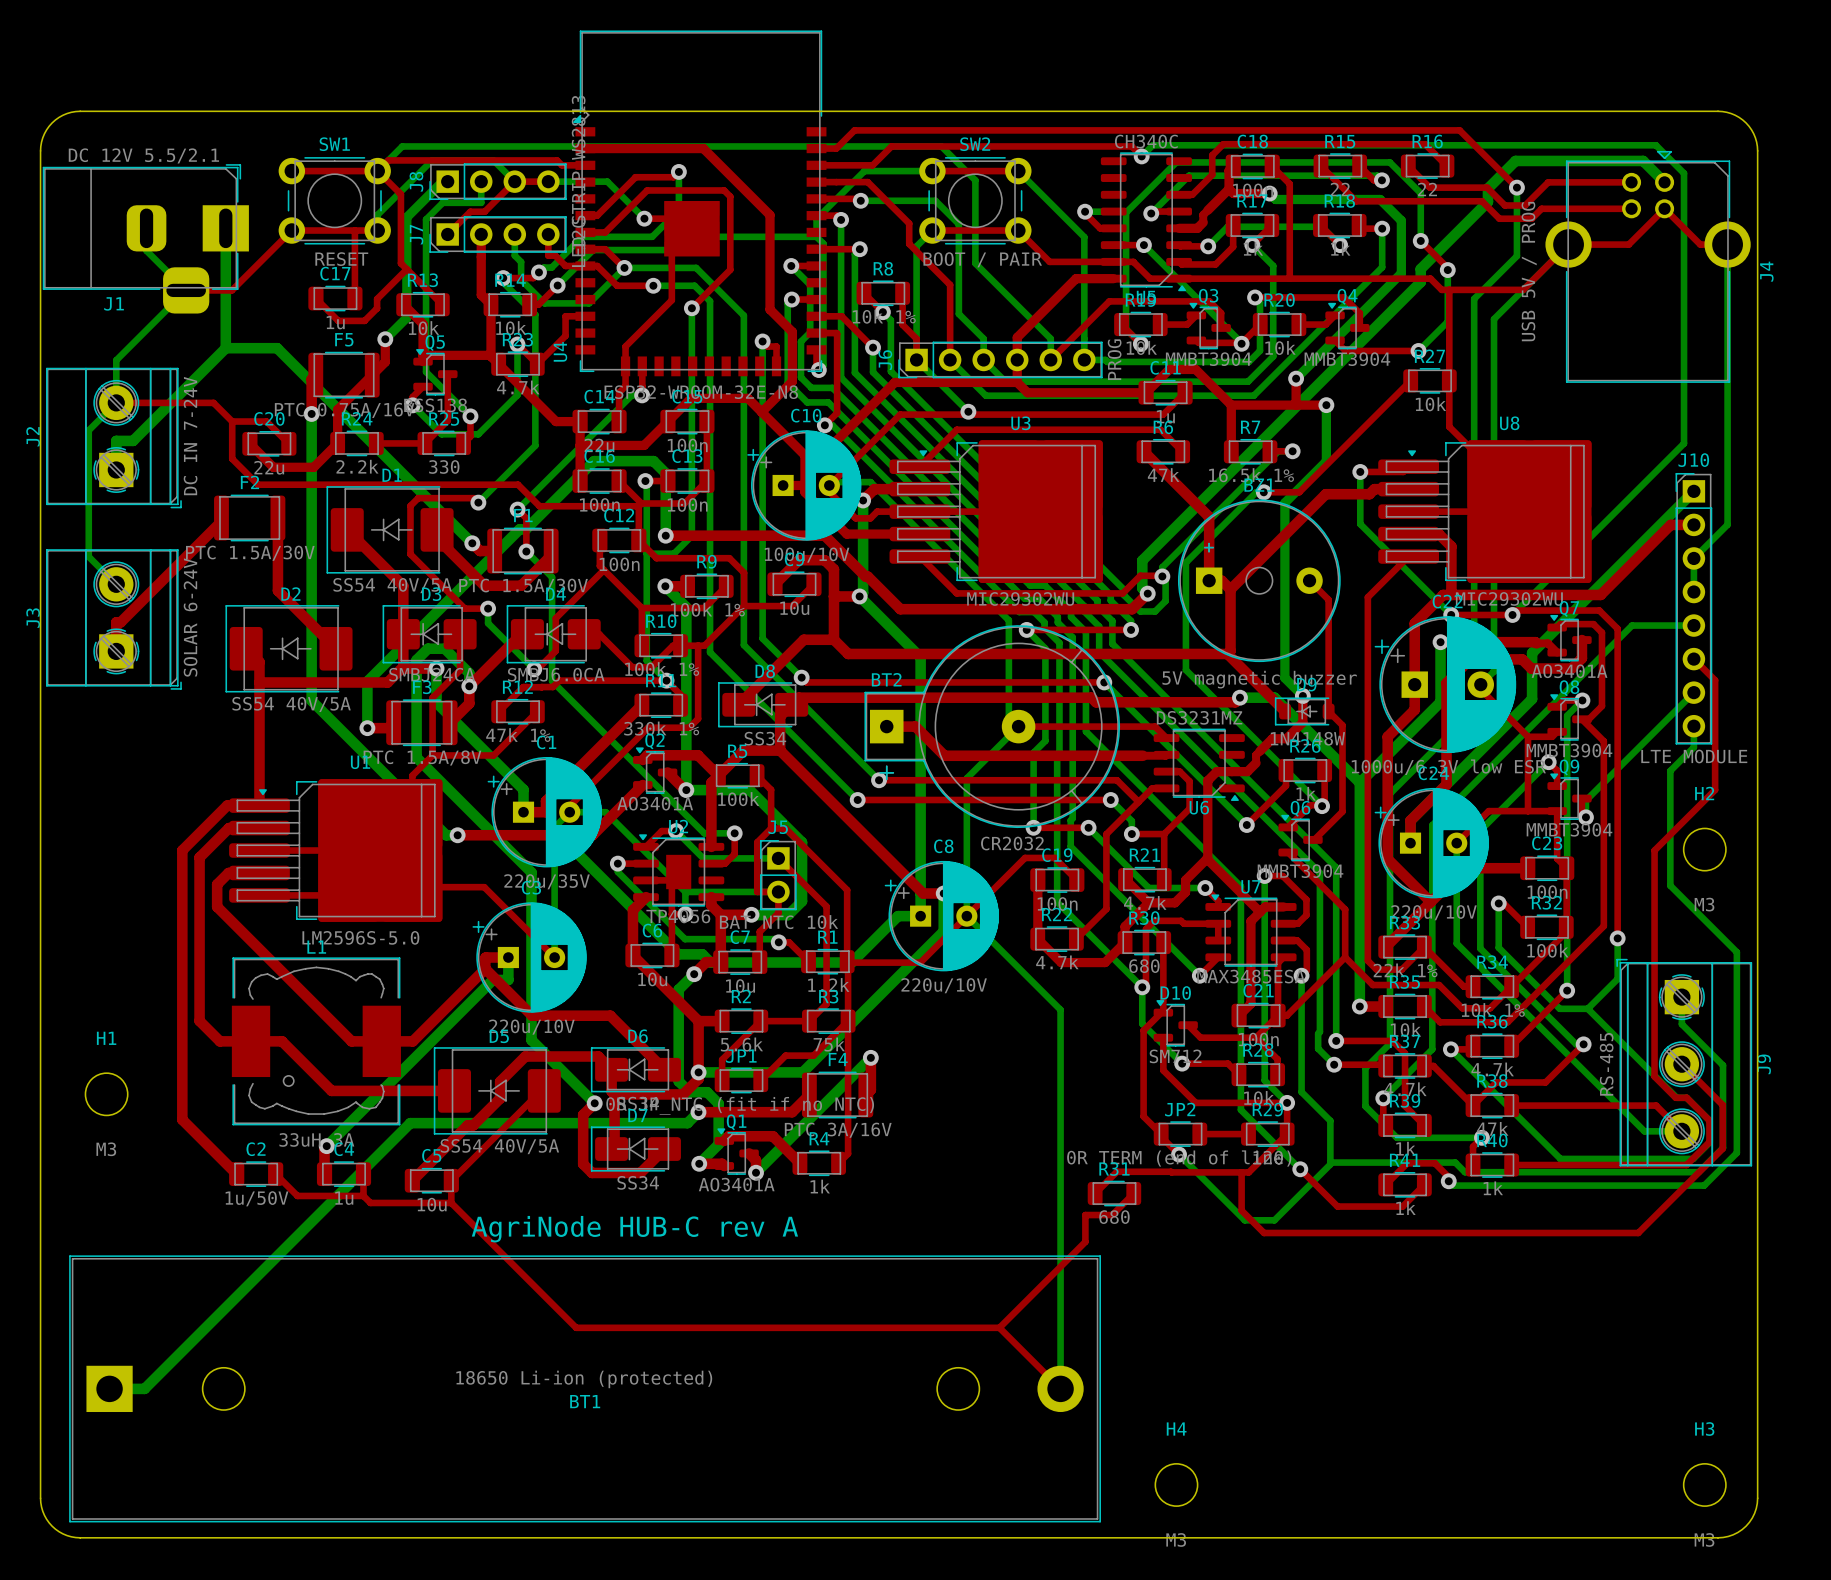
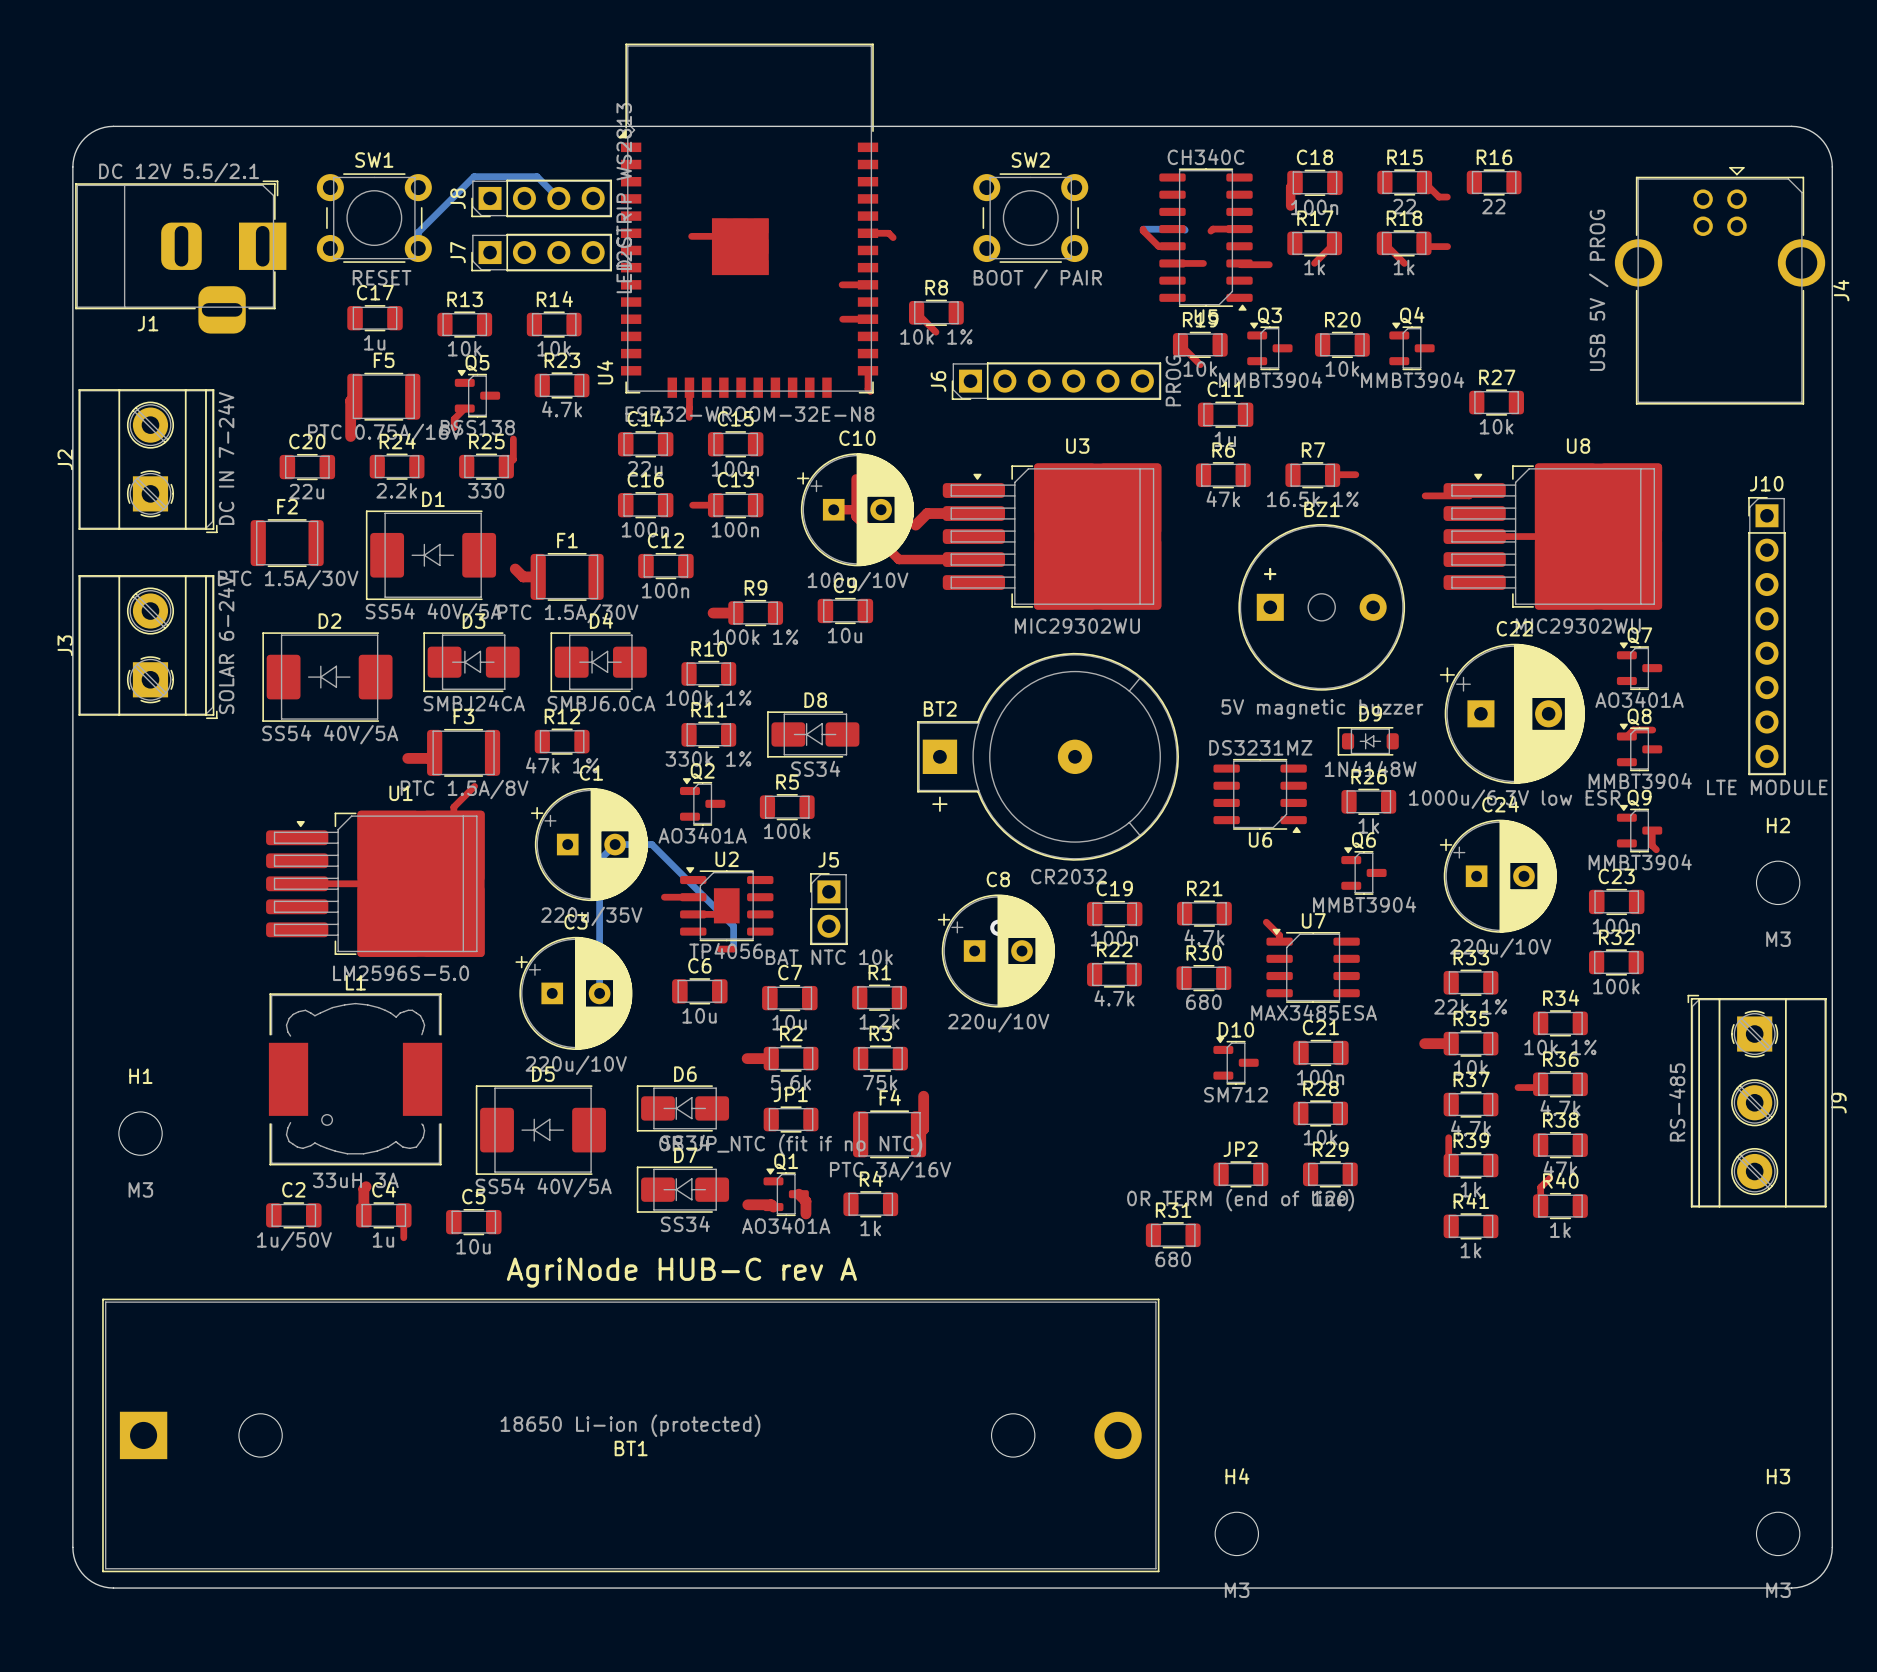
top track: (585, 148) (703, 148) (770, 215) (770, 309) (792, 331) (792, 381) (761, 412) -> none
top track: (816, 148) (836, 148) (854, 130) (1459, 130) (1516, 187) -> none
top track: (1141, 156) (1131, 146) (891, 146) (872, 165) (816, 165) -> none
bottom track: (1141, 156) (1152, 145) (1655, 145) (1684, 173) (1684, 443) (1512, 614) -> none
via: (1141, 156) -> none
top track: (585, 165) (561, 165) (557, 160) (388, 160) (377, 171) -> none
top track: (1272, 166) (1289, 183) (1289, 278) -> none
top track: (1321, 166) (1356, 201) (1482, 201) (1499, 218) (1531, 218) (1541, 208) (1631, 208) -> none
top track: (1408, 166) (1429, 187) (1487, 187) (1504, 205) (1525, 205) (1548, 182) (1631, 182) -> none
top track: (1446, 166) (1425, 144) (1223, 144) (1212, 155) (1212, 174) (1192, 194) (1179, 194) -> none
top track: (291, 171) (377, 171) -> none
top track: (377, 171) (400, 194) (400, 263) (406, 269) -> none
bottom track: (377, 171) (402, 146) (941, 146) (975, 180) (975, 263) (1050, 338) (1050, 359) -> none
top track: (678, 171) (673, 177) (635, 177) (597, 215) (585, 215) -> none
bottom track: (678, 171) (678, 210) (652, 236) (582, 236) (551, 267) (543, 267) (538, 272) -> none
via: (678, 171) -> none
top track: (932, 171) (1018, 171) -> none
bottom track: (932, 171) (864, 171) (816, 218) (816, 236) -> none
bottom track: (1018, 171) (1084, 237) (1084, 359) (1105, 359) (1107, 361) (1248, 361) (1260, 350) (1260, 302) (1255, 297) -> none
bottom track: (1381, 180) (1377, 175) (1189, 175) (1151, 213) -> none
via: (1381, 180) -> none
bottom track: (447, 181) (442, 181) (406, 217) (406, 317) (385, 339) -> none
bottom track: (481, 181) (481, 202) (442, 202) (426, 219) (426, 371) (470, 416) -> none
top track: (548, 181) (514, 181) (484, 211) (470, 211) (447, 234) -> none
bottom track: (548, 181) (607, 181) (644, 218) -> none
top track: (816, 182) (867, 182) (909, 223) (909, 243) (950, 284) (950, 359) -> none
bottom track: (1664, 182) (1643, 160) (1515, 160) (1487, 188) (1487, 201) (1420, 269) (1420, 282) (1142, 560) (1142, 588) (1147, 593) -> none
bottom track: (1516, 187) (1516, 256) (1474, 298) (1474, 633) (1456, 651) (1456, 727) (1390, 793) (1390, 1043) (1365, 1068) (1365, 1106) (1396, 1137) (1481, 1137) -> none
via: (1516, 187) -> none
top track: (1269, 193) (1233, 193) (1229, 189) (1203, 214) (1203, 222) (1197, 228) (1179, 228) -> none
bottom track: (1269, 193) (1275, 199) (1380, 199) (1401, 220) (1401, 273) (1296, 378) -> none
via: (1269, 193) -> none
top track: (816, 198) (858, 198) (860, 200) -> none
bottom track: (860, 200) (935, 200) (958, 224) (958, 313) (983, 338) (983, 359) (1005, 381) (1248, 381) (1273, 356) (1273, 265) (1252, 244) -> none
via: (860, 200) -> none
top track: (712, 208) (671, 208) (671, 300) (625, 346) (625, 386) (619, 392) (619, 421) -> none
via: (1085, 211) -> none
via: (1151, 213) -> none
via: (644, 218) -> none
bottom track: (841, 219) (841, 377) (1035, 572) (1050, 572) (1084, 606) (1084, 611) (1099, 626) (1099, 652) (1319, 872) (1319, 1031) (1318, 1033) (1318, 1048) (1334, 1064) -> none
via: (841, 219) -> none
top track: (1233, 225) (1233, 246) (1215, 264) (1181, 264) (1179, 261) -> none
bottom track: (146, 228) (146, 250) (186, 290) (116, 360) (116, 402) (88, 430) (88, 556) (116, 584) -> none
bottom track: (225, 228) (225, 348) -> none
bottom track: (1382, 228) (1382, 267) (1253, 395) (985, 395) (950, 359) -> none
via: (1382, 228) -> none
top track: (354, 230) (354, 298) -> none
top track: (377, 230) (291, 230) (231, 290) (186, 290) -> none
top track: (932, 230) (1018, 230) (1049, 261) (1133, 261) (1150, 278) (1430, 278) (1441, 289) (1523, 289) (1568, 244) (1628, 244) (1664, 208) (1700, 244) (1727, 244) -> none
bottom track: (932, 230) (916, 246) (916, 359) (968, 411) -> none
top track: (585, 232) (605, 232) (647, 190) (724, 190) (730, 196) (730, 269) (691, 308) -> none
top track: (481, 234) (481, 295) (490, 304) (490, 356) (556, 421) (580, 421) (580, 481) -> none
bottom track: (514, 234) (514, 255) (521, 261) (521, 279) (544, 303) (589, 303) (624, 267) (696, 267) (743, 315) (743, 645) (879, 780) -> none
top track: (548, 234) (548, 255) (555, 255) (565, 265) (597, 265) (617, 285) (653, 285) -> none
bottom track: (816, 236) (716, 236) (702, 250) (593, 250) (557, 285) -> none
bottom track: (816, 236) (823, 243) (823, 365) (818, 370) -> none
top track: (1420, 240) (1447, 270) -> none
bottom track: (1420, 240) (1420, 193) (1389, 162) (1176, 162) (1126, 212) (1126, 329) (1140, 343) -> none
via: (1420, 240) -> none
via: (1252, 244) -> none
bottom track: (1568, 244) (1494, 319) (1494, 671) (1480, 684) -> none
bottom track: (1727, 244) (1727, 524) (1693, 558) (1693, 592) -> none
bottom track: (1143, 245) (1241, 343) -> none
via: (1143, 245) -> none
bottom track: (1340, 245) (1321, 226) (1227, 226) (1208, 246) -> none
via: (1340, 245) -> none
via: (1208, 246) -> none
top track: (585, 249) (605, 249) (624, 267) -> none
top track: (816, 249) (859, 249) -> none
bottom track: (859, 249) (854, 254) (854, 372) (1041, 559) (1056, 559) (1097, 600) (1097, 606) (1112, 620) (1112, 643) (1336, 867) (1336, 1040) -> none
via: (859, 249) -> none
bottom track: (791, 265) (810, 284) (810, 332) (800, 341) (800, 377) (811, 387) (832, 387) (1030, 585) (1045, 585) (1071, 611) (1071, 617) (1085, 631) (1085, 731) (1240, 886) (1240, 1109) (1300, 1169) -> none
via: (791, 265) -> none
via: (624, 267) -> none
top track: (406, 269) (377, 299) (377, 308) (364, 320) (338, 320) (315, 298) -> none
top track: (406, 269) (442, 304) -> none
bottom track: (1447, 270) (1447, 321) (1418, 350) -> none
via: (1447, 270) -> none
top track: (538, 272) (533, 278) (503, 278) -> none
via: (538, 272) -> none
bottom track: (503, 278) (503, 282) (535, 314) (535, 445) (478, 502) -> none
via: (503, 278) -> none
top track: (1113, 278) (1076, 278) (1017, 337) (1017, 382) -> none
top track: (557, 285) (538, 304) (529, 304) -> none
via: (557, 285) -> none
bottom track: (653, 285) (694, 285) (710, 301) (710, 652) (857, 799) -> none
via: (653, 285) -> none
top track: (1449, 289) (1449, 426) (1497, 474) (1561, 474) -> none
top track: (902, 293) (902, 324) (916, 338) (916, 359) -> none
top track: (1255, 297) (1343, 297) (1359, 313) (1359, 327) -> none
via: (1255, 297) -> none
bottom track: (791, 299) (787, 303) (787, 382) (807, 402) (828, 402) (1024, 598) (1039, 598) (1057, 617) (1057, 622) (1072, 637) (1072, 818) (1070, 820) (1070, 846) (1199, 975) -> none
via: (791, 299) -> none
top track: (403, 304) (423, 324) (423, 361) -> none
bottom track: (691, 308) (691, 535) (674, 553) (646, 553) -> none
via: (691, 308) -> none
bottom track: (882, 312) (890, 320) (890, 371) (1052, 532) (1067, 532) (1123, 589) (1123, 595) (1140, 611) (1155, 611) (1165, 601) (1165, 579) (1162, 576) (1162, 567) (1278, 451) (1292, 451) -> none
via: (882, 312) -> none
top track: (1196, 315) (1187, 324) (1160, 324) -> none
top track: (1335, 315) (1325, 324) (1298, 324) -> none
top track: (585, 316) (565, 316) (565, 335) (537, 364) (517, 344) -> none
top track: (816, 316) (841, 316) (873, 347) -> none
top track: (1260, 324) (1241, 342) (1198, 342) (1196, 340) -> none
top track: (1221, 327) (1221, 313) (1209, 301) (1109, 301) (1050, 359) -> none
top track: (816, 333) (837, 333) (837, 413) (824, 425) -> none
top track: (385, 339) (385, 362) (337, 409) (337, 443) (313, 467) (273, 467) (249, 443) -> none
via: (385, 339) -> none
top track: (1335, 340) (1345, 350) (1418, 350) -> none
top track: (762, 341) (767, 346) (776, 346) (776, 366) -> none
bottom track: (762, 341) (762, 638) (801, 677) -> none
via: (762, 341) -> none
via: (1140, 343) -> none
via: (1241, 343) -> none
bottom track: (517, 344) (517, 395) (478, 434) (441, 434) (412, 405) -> none
via: (517, 344) -> none
bottom track: (873, 347) (873, 372) (1046, 545) (1061, 545) (1110, 595) (1110, 600) (1131, 620) (1131, 629) -> none
via: (873, 347) -> none
bottom track: (225, 348) (277, 348) (472, 543) -> none
bottom track: (225, 348) (133, 440) (116, 440) (116, 469) -> none
via: (1418, 350) -> none
top track: (423, 355) (490, 355) -> none
via: (818, 370) -> none
top track: (447, 374) (447, 420) (424, 443) (376, 443) -> none
top track: (1296, 378) (1296, 405) -> none
via: (1296, 378) -> none
top track: (1410, 380) (1299, 492) (1263, 492) -> none
top track: (1017, 382) (1027, 392) (1146, 392) (1169, 369) (1195, 369) (1231, 405) -> none
top track: (1017, 382) (894, 382) (821, 455) (804, 455) (761, 412) -> none
top track: (1185, 392) (1163, 414) (900, 414) (829, 485) (829, 491) (855, 518) (870, 518) (877, 511) (1040, 511) -> none
bottom track: (642, 395) (631, 395) (517, 509) -> none
via: (642, 395) -> none
top track: (116, 402) (213, 402) (232, 421) -> none
via: (412, 405) -> none
top track: (1231, 405) (1326, 405) -> none
top track: (1231, 405) (1231, 451) -> none
bottom track: (1326, 405) (1326, 461) (1284, 502) (1284, 678) (1302, 696) -> none
via: (1326, 405) -> none
via: (968, 411) -> none
top track: (761, 412) (747, 398) (691, 398) (644, 445) (580, 445) -> none
bottom track: (311, 413) (311, 700) (446, 835) (457, 835) -> none
via: (311, 413) -> none
via: (470, 416) -> none
top track: (232, 421) (266, 421) (288, 443) -> none
top track: (232, 421) (232, 458) (258, 484) (518, 484) (539, 506) (638, 506) -> none
top track: (706, 421) (706, 481) (684, 503) (641, 503) -> none
bottom track: (824, 425) (832, 425) (1019, 612) (1034, 612) (1044, 622) (1044, 628) (1059, 642) (1057, 902) (1142, 987) (1142, 1023) (1182, 1063) -> none
via: (824, 425) -> none
top track: (1144, 451) (1209, 516) (1209, 580) (1221, 580) (1230, 589) -> none
top track: (1182, 451) (1160, 429) (956, 429) (919, 466) -> none
via: (1292, 451) -> none
bottom track: (1360, 471) (1360, 524) (1451, 614) -> none
via: (1360, 471) -> none
top track: (619, 481) (641, 503) -> none
bottom track: (645, 481) (646, 660) (666, 680) -> none
via: (645, 481) -> none
bottom track: (829, 485) (832, 482) (870, 482) (1008, 620) (1008, 716) (1018, 726) (966, 778) (966, 916) (1060, 1009) (1060, 1388) -> none
top track: (1408, 489) (1374, 489) (1369, 494) (1325, 494) (1230, 589) -> none
bottom track: (1693, 491) (1532, 653) (1532, 699) (1410, 820) (1410, 843) -> none
bottom track: (1263, 492) (1256, 492) (1185, 562) (1185, 670) (1322, 806) -> none
via: (1263, 492) -> none
bottom track: (863, 500) (863, 592) (859, 596) (920, 657) (920, 916) (898, 916) (851, 962) (710, 962) (702, 954) (678, 954) (576, 852) (576, 837) -> none
via: (863, 500) -> none
top track: (478, 502) (473, 498) (418, 498) (410, 505) (410, 554) (464, 608) (488, 608) -> none
via: (478, 502) -> none
top track: (638, 506) (638, 540) (656, 558) (729, 558) (744, 572) (744, 606) -> none
top track: (517, 509) (526, 518) (526, 551) -> none
via: (517, 509) -> none
top track: (221, 518) (221, 521) (120, 622) (116, 622) (116, 651) -> none
top track: (277, 518) (277, 590) (336, 648) -> none
top track: (1693, 524) (1670, 524) (1600, 594) (1443, 594) (1414, 623) (1414, 709) (1387, 736) (1387, 859) (1430, 902) -> none
top track: (347, 529) (403, 585) (403, 666) -> none
top track: (437, 529) (437, 538) (484, 585) (521, 585) (551, 555) (551, 551) -> none
top track: (1408, 534) (1438, 534) (1451, 546) (1451, 594) -> none
top track: (665, 535) (824, 535) (900, 609) (1132, 609) (1147, 593) -> none
bottom track: (665, 535) (665, 473) (653, 461) (594, 461) (525, 529) (519, 529) (367, 681) (367, 728) -> none
via: (665, 535) -> none
top track: (599, 540) (599, 566) (603, 570) -> none
via: (472, 543) -> none
bottom track: (526, 551) (552, 577) (552, 681) (704, 833) (734, 833) -> none
via: (526, 551) -> none
top track: (919, 556) (956, 593) (1122, 593) (1140, 575) (1162, 576) -> none
top track: (1408, 556) (1367, 597) (1367, 960) (1376, 969) (1401, 969) (1424, 947) (1463, 986) (1473, 986) -> none
top track: (603, 570) (641, 608) -> none
top track: (603, 570) (555, 618) (555, 651) (537, 669) (534, 669) -> none
via: (1162, 576) -> none
top track: (1309, 580) (1328, 599) (1328, 711) (1342, 725) (1342, 811) (1312, 839) -> none
top track: (775, 584) (799, 560) (824, 560) (833, 569) (833, 639) -> none
top track: (813, 584) (792, 606) (744, 606) -> none
bottom track: (665, 586) (686, 607) (686, 790) (749, 790) (802, 842) (802, 901) (788, 915) (751, 914) -> none
via: (665, 586) -> none
top track: (726, 586) (704, 608) (641, 608) -> none
top track: (1230, 589) (1230, 651) (1227, 653) -> none
via: (1147, 593) -> none
top track: (833, 596) (859, 596) -> none
via: (859, 596) -> none
top track: (744, 606) (704, 645) (673, 645) (651, 667) (632, 667) (599, 634) (584, 634) -> none
bottom track: (488, 608) (488, 623) (534, 669) -> none
via: (488, 608) -> none
top track: (641, 608) (641, 645) -> none
top track: (1451, 614) (1512, 614) (1517, 610) (1599, 610) (1617, 628) (1617, 938) -> none
via: (1451, 614) -> none
via: (1512, 614) -> none
bottom track: (1693, 625) (1632, 625) (1432, 825) (1432, 1049) (1383, 1098) -> none
top track: (1557, 627) (1560, 624) (1593, 624) (1601, 632) (1601, 706) (1588, 719) (1581, 719) (1603, 741) (1603, 926) (1507, 1022) (1440, 1022) (1424, 1006) -> none
top track: (1026, 629) (1131, 629) -> none
bottom track: (1026, 629) (1045, 648) (1045, 740) (1033, 752) (1033, 827) -> none
via: (1026, 629) -> none
via: (1131, 629) -> none
top track: (460, 634) (460, 670) (432, 697) (432, 755) (493, 755) (537, 711) -> none
top track: (527, 634) (521, 634) (469, 686) (469, 703) (450, 722) -> none
top track: (833, 639) (848, 653) (1227, 653) -> none
top track: (833, 639) (803, 639) (738, 704) -> none
top track: (1581, 640) (1581, 658) (1571, 668) (1531, 668) (1522, 659) (1470, 659) (1446, 683) (1446, 784) (1410, 820) (1410, 843) -> none
top track: (1440, 642) (1535, 642) (1547, 643) (1557, 652) -> none
bottom track: (1440, 642) (1440, 702) (1359, 782) -> none
via: (1440, 642) -> none
top track: (698, 645) (698, 718) (689, 727) (648, 727) (569, 806) (569, 812) -> none
top track: (246, 648) (259, 662) (259, 805) (227, 805) (182, 850) (182, 1119) (236, 1174) -> none
top track: (1227, 653) (1285, 711) -> none
top track: (1693, 659) (1715, 680) (1715, 789) (1654, 850) (1654, 1076) (1675, 1097) (1686, 1097) (1709, 1120) (1709, 1142) (1686, 1165) (1511, 1165) -> none
top track: (403, 666) (387, 682) (259, 682) -> none
top track: (403, 666) (405, 668) (436, 668) -> none
bottom track: (436, 668) (436, 702) (523, 789) (523, 812) -> none
via: (436, 668) -> none
via: (534, 669) -> none
top track: (801, 677) (806, 682) (1104, 682) -> none
via: (801, 677) -> none
via: (666, 680) -> none
bottom track: (1104, 682) (1246, 825) -> none
via: (1104, 682) -> none
top track: (1480, 684) (1480, 689) (1528, 736) -> none
bottom track: (469, 686) (469, 673) (444, 648) (427, 648) (416, 660) (416, 757) (531, 872) (531, 1040) (594, 1103) -> none
via: (469, 686) -> none
top track: (526, 687) (523, 687) (498, 711) -> none
top track: (526, 687) (541, 687) -> none
top track: (541, 687) (552, 687) (559, 680) (666, 680) (680, 694) (680, 705) -> none
bottom track: (1693, 692) (1585, 800) (1585, 817) -> none
top track: (1302, 696) (1302, 722) (1286, 738) (1272, 738) (1256, 755) (1256, 763) (1247, 771) (1216, 771) (1207, 780) (1207, 859) -> none
via: (1302, 696) -> none
top track: (1239, 697) (1235, 702) (1096, 702) (1091, 697) (798, 697) (780, 716) (780, 750) -> none
bottom track: (1239, 697) (1274, 697) (1359, 782) -> none
via: (1239, 697) -> none
bottom track: (1582, 700) (1567, 715) (1567, 990) -> none
via: (1582, 700) -> none
top track: (641, 705) (545, 801) (545, 812) (523, 812) -> none
top track: (886, 726) (915, 726) (944, 755) (1166, 754) -> none
top track: (1018, 726) (1155, 726) (1166, 738) -> none
bottom track: (1693, 726) (1693, 747) (1670, 770) (1670, 885) (1736, 952) (1736, 1152) (1704, 1185) (1453, 1185) (1448, 1181) -> none
via: (367, 728) -> none
top track: (1557, 731) (1552, 736) (1528, 736) -> none
top track: (1528, 736) (1528, 811) -> none
top track: (780, 750) (923, 893) (943, 893) -> none
top track: (780, 750) (743, 750) (711, 782) (711, 846) -> none
top track: (642, 759) (647, 755) (698, 755) (718, 775) -> none
top track: (1548, 762) (1557, 770) (1557, 786) -> none
bottom track: (1548, 762) (1480, 830) (1480, 948) (1576, 1044) (1583, 1044) -> none
via: (1548, 762) -> none
top track: (1286, 770) (1286, 785) (1246, 825) -> none
top track: (1324, 770) (1324, 801) (1321, 805) -> none
top track: (1166, 771) (1179, 771) (1189, 781) (1189, 808) (1164, 834) -> none
top track: (667, 772) (686, 790) -> none
top track: (757, 775) (771, 789) (771, 828) -> none
top track: (879, 780) (1117, 780) (1138, 801) -> none
via: (879, 780) -> none
bottom track: (1359, 782) (1359, 1006) -> none
top track: (642, 785) (592, 835) (457, 835) -> none
top track: (1166, 788) (1152, 788) (1106, 834) (1106, 909) (1076, 939) -> none
via: (686, 790) -> none
top track: (857, 799) (1110, 799) -> none
via: (857, 799) -> none
bottom track: (1110, 799) (1131, 821) (1131, 834) -> none
via: (1110, 799) -> none
top track: (1321, 805) (1310, 805) (1288, 827) -> none
via: (1322, 806) -> none
via: (1585, 817) -> none
via: (1246, 825) -> none
top track: (1033, 827) (1088, 827) -> none
via: (1033, 827) -> none
bottom track: (1088, 827) (1148, 888) (1205, 888) -> none
via: (1088, 827) -> none
top track: (259, 828) (229, 828) (199, 857) (199, 1020) (219, 1041) (282, 1041) (331, 1090) (454, 1090) -> none
top track: (771, 828) (785, 828) (847, 890) (848, 962) -> none
top track: (771, 828) (757, 842) (757, 891) (778, 891) (778, 913) (759, 931) (759, 962) -> none
top track: (676, 831) (661, 831) (646, 846) -> none
bottom track: (676, 831) (703, 858) (778, 858) -> none
via: (676, 831) -> none
top track: (734, 833) (734, 854) (725, 863) (711, 863) -> none
via: (734, 833) -> none
top track: (1131, 834) (1164, 834) -> none
via: (1131, 834) -> none
top track: (1164, 834) (1164, 879) -> none
via: (457, 835) -> none
top track: (1456, 843) (1488, 811) (1557, 811) (1557, 858) (1566, 868) (1566, 932) (1490, 1008) (1462, 1008) (1439, 985) (1372, 985) (1345, 957) -> none
bottom track: (1456, 843) (1456, 943) (1644, 1131) (1681, 1131) -> none
top track: (1288, 852) (1345, 909) (1345, 957) -> none
top track: (778, 858) (826, 906) (826, 1004) (809, 1021) (760, 1021) (722, 1059) (722, 1080) -> none
top track: (1207, 859) (1260, 912) -> none
top track: (1207, 859) (1185, 880) (1185, 892) (1174, 902) (1148, 902) -> none
bottom track: (617, 863) (617, 871) (685, 939) (775, 939) (778, 942) -> none
via: (617, 863) -> none
top track: (1527, 868) (1464, 868) (1385, 947) -> none
top track: (259, 872) (228, 872) (217, 884) (217, 906) (351, 1041) (412, 1041) (485, 968) -> none
top track: (678, 872) (670, 880) (671, 881) (671, 955) -> none
top track: (1264, 876) (1282, 876) (1306, 899) (1306, 915) (1297, 923) (1283, 923) -> none
bottom track: (1264, 876) (1264, 1080) (1287, 1102) -> none
via: (1264, 876) -> none
top track: (1125, 879) (1148, 902) -> none
top track: (1037, 880) (1037, 939) -> none
top track: (1076, 880) (1054, 857) (1025, 857) (920, 962) (848, 962) -> none
via: (1205, 888) -> none
bottom track: (685, 891) (778, 891) -> none
bottom track: (943, 893) (943, 931) (802, 1072) (698, 1072) -> none
top track: (259, 895) (340, 895) (348, 887) (484, 887) (554, 957) -> none
top track: (646, 897) (632, 910) (632, 955) (698, 1021) (698, 1078) (683, 1094) (614, 1094) -> none
top track: (711, 897) (711, 905) (720, 914) -> none
top track: (1148, 902) (1125, 926) (1125, 942) (1105, 962) (1061, 962) (1037, 939) -> none
top track: (1498, 903) (1503, 903) (1527, 927) -> none
bottom track: (1498, 903) (1498, 947) (1559, 1008) (1587, 1008) -> none
via: (1498, 903) -> none
top track: (1283, 906) (1265, 906) (1250, 921) (1250, 1003) (1239, 1015) -> none
via: (685, 914) -> none
top track: (720, 914) (751, 914) -> none
top track: (720, 914) (720, 962) (706, 962) (694, 974) -> none
via: (751, 914) -> none
bottom track: (1617, 938) (1617, 978) (1587, 1008) -> none
via: (1617, 938) -> none
top track: (1218, 940) (1218, 923) (1183, 923) (1181, 920) (1154, 920) (1145, 929) (1145, 983) (1142, 987) -> none
top track: (1283, 940) (1297, 940) (1306, 949) (1306, 970) (1301, 975) -> none
top track: (778, 942) (789, 942) (808, 961) -> none
via: (778, 942) -> none
top track: (1163, 942) (1163, 1012) (1143, 1030) (1143, 1116) (1179, 1154) -> none
top track: (508, 957) (485, 957) (485, 968) -> none
bottom track: (508, 957) (508, 979) (492, 979) (326, 1146) -> none
top track: (1218, 957) (1199, 975) -> none
top track: (1283, 957) (1278, 962) (1278, 1015) -> none
top track: (1345, 957) (1286, 1015) (1278, 1015) -> none
top track: (848, 962) (848, 1153) (838, 1163) -> none
top track: (485, 968) (532, 1015) (610, 1015) (664, 1069) -> none
bottom track: (694, 974) (678, 989) (678, 1081) (689, 1092) (707, 1092) (718, 1103) (718, 1144) (699, 1163) -> none
via: (694, 974) -> none
via: (1199, 975) -> none
bottom track: (1301, 975) (1301, 1092) (1330, 1120) (1330, 1164) (1274, 1220) (1244, 1220) (1179, 1154) -> none
via: (1301, 975) -> none
via: (1142, 987) -> none
top track: (1567, 990) (1511, 1046) -> none
via: (1567, 990) -> none
bottom track: (1681, 997) (1681, 1024) (1723, 1065) (1723, 1147) (1698, 1172) (1464, 1172) (1455, 1162) (1330, 1162) -> none
via: (1359, 1006) -> none
bottom track: (1587, 1008) (1676, 1097) (1686, 1097) (1709, 1120) (1709, 1142) (1693, 1158) (1560, 1158) (1450, 1049) -> none
top track: (1278, 1015) (1255, 1037) -> none
top track: (848, 1021) (813, 1055) (785, 1055) (760, 1080) -> none
top track: (1188, 1025) (1200, 1037) (1255, 1037) -> none
top track: (1163, 1037) (1163, 1070) (1195, 1102) (1287, 1102) (1287, 1134) (1248, 1172) (1116, 1171) (1095, 1193) -> none
top track: (1255, 1037) (1277, 1059) (1277, 1074) -> none
top track: (1336, 1040) (1392, 1040) (1405, 1053) (1405, 1106) (1424, 1125) -> none
via: (1336, 1040) -> none
top track: (1583, 1044) (1545, 1082) (1496, 1082) (1473, 1105) (1433, 1065) (1424, 1065) -> none
via: (1583, 1044) -> none
via: (1450, 1049) -> none
bottom track: (870, 1057) (756, 1172) -> none
via: (870, 1057) -> none
top track: (1182, 1063) (1227, 1063) (1238, 1074) -> none
via: (1182, 1063) -> none
top track: (1334, 1064) (1385, 1065) -> none
via: (1334, 1064) -> none
top track: (1681, 1064) (1722, 1105) (1722, 1148) (1638, 1233) (1264, 1233) (1241, 1210) (1241, 1172) -> none
via: (698, 1072) -> none
top track: (544, 1090) (541, 1090) (451, 1180) (451, 1202) -> none
top track: (614, 1094) (611, 1091) (611, 1069) (598, 1056) (525, 1056) (500, 1081) (500, 1098) (473, 1125) (467, 1125) (412, 1180) -> none
top track: (614, 1094) (614, 1146) (611, 1149) -> none
top track: (809, 1095) (792, 1112) (698, 1112) -> none
via: (1383, 1098) -> none
via: (1287, 1102) -> none
top track: (594, 1103) (583, 1114) (583, 1164) (592, 1172) (640, 1172) (664, 1149) -> none
via: (594, 1103) -> none
top track: (1511, 1105) (1656, 1105) (1681, 1131) -> none
bottom track: (698, 1112) (687, 1123) (410, 1123) (144, 1388) (109, 1388) -> none
via: (698, 1112) -> none
top track: (1199, 1134) (1248, 1134) -> none
via: (1481, 1137) -> none
top track: (724, 1140) (728, 1136) (772, 1136) (799, 1163) -> none
via: (326, 1146) -> none
via: (1179, 1154) -> none
via: (699, 1163) -> none
top track: (1300, 1169) (1337, 1206) (1402, 1206) (1424, 1184) -> none
via: (1300, 1169) -> none
via: (756, 1172) -> none
top track: (275, 1174) (297, 1195) (363, 1195) (370, 1202) (451, 1202) -> none
top track: (1448, 1181) (1448, 1177) (1434, 1163) (1407, 1163) (1385, 1184) -> none
via: (1448, 1181) -> none
top track: (1133, 1193) (1112, 1215) (1085, 1215) (1085, 1241) (999, 1327) -> none
top track: (451, 1202) (576, 1327) (999, 1327) -> none
top track: (999, 1327) (1060, 1388) -> none

